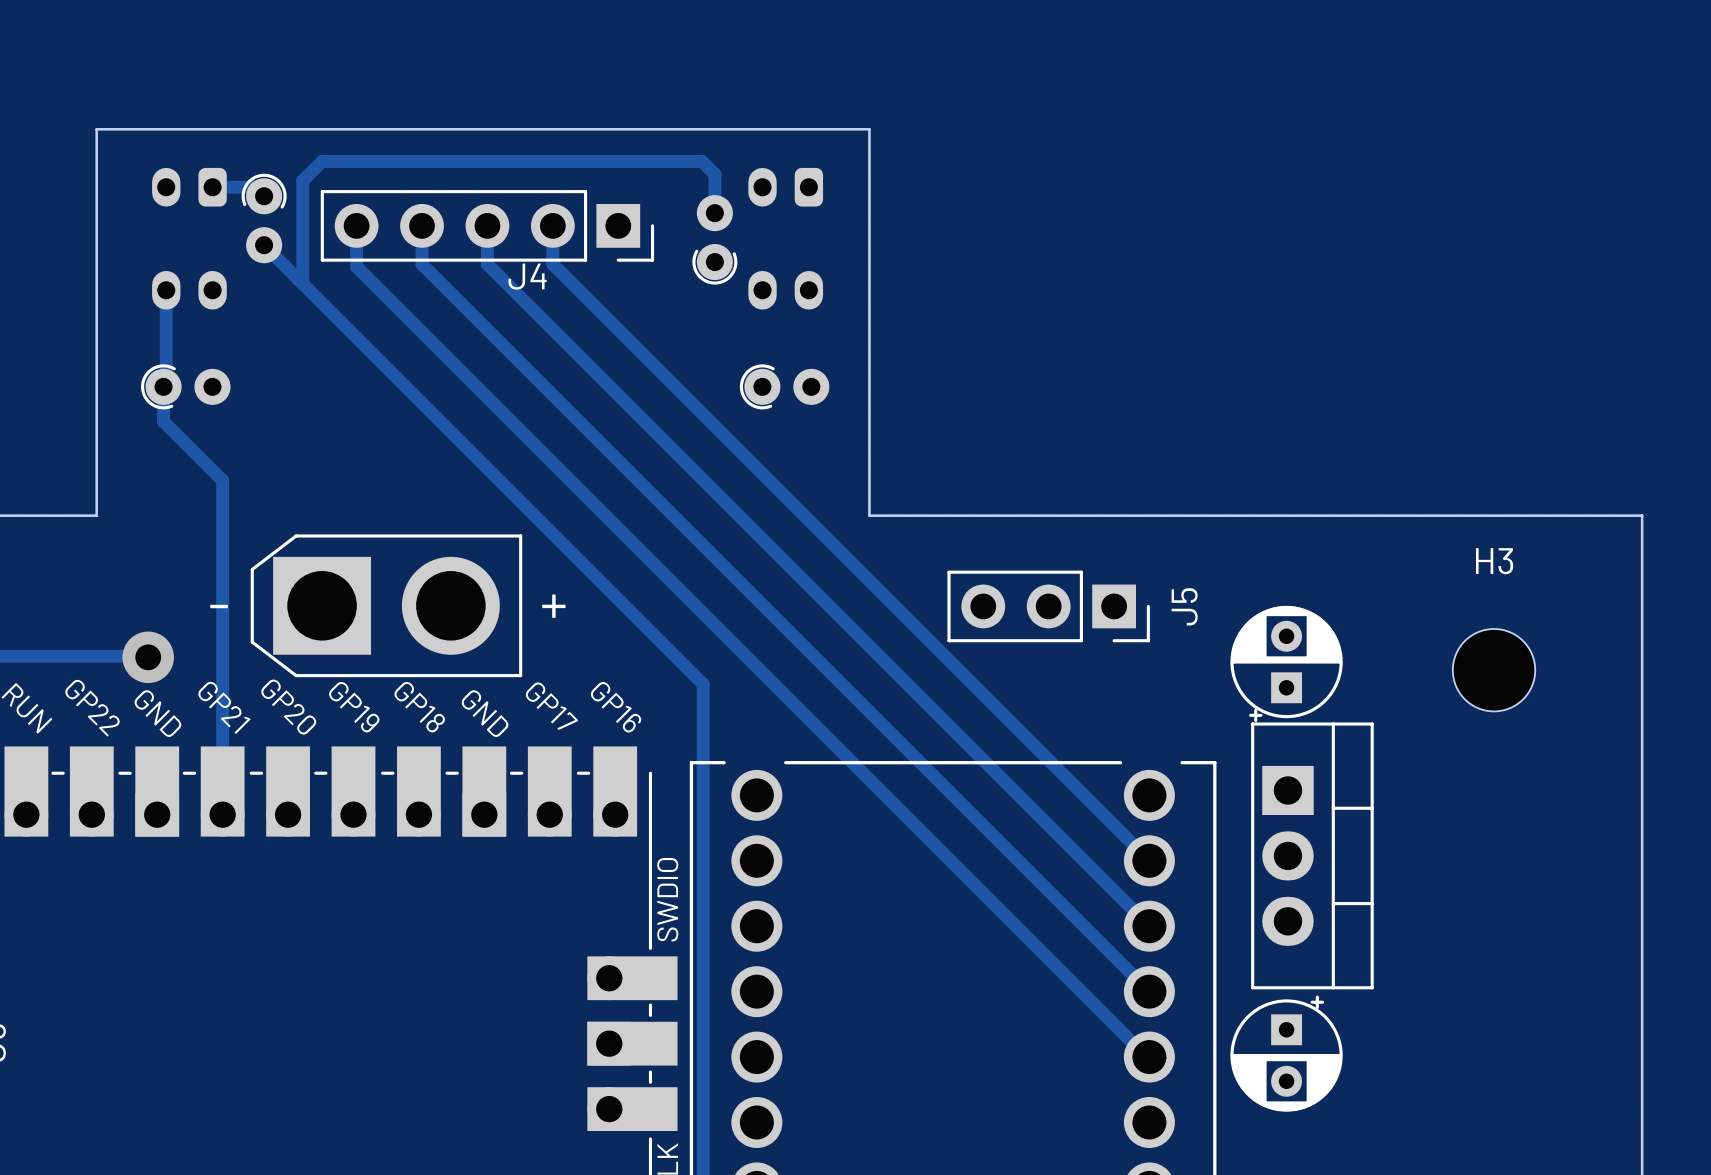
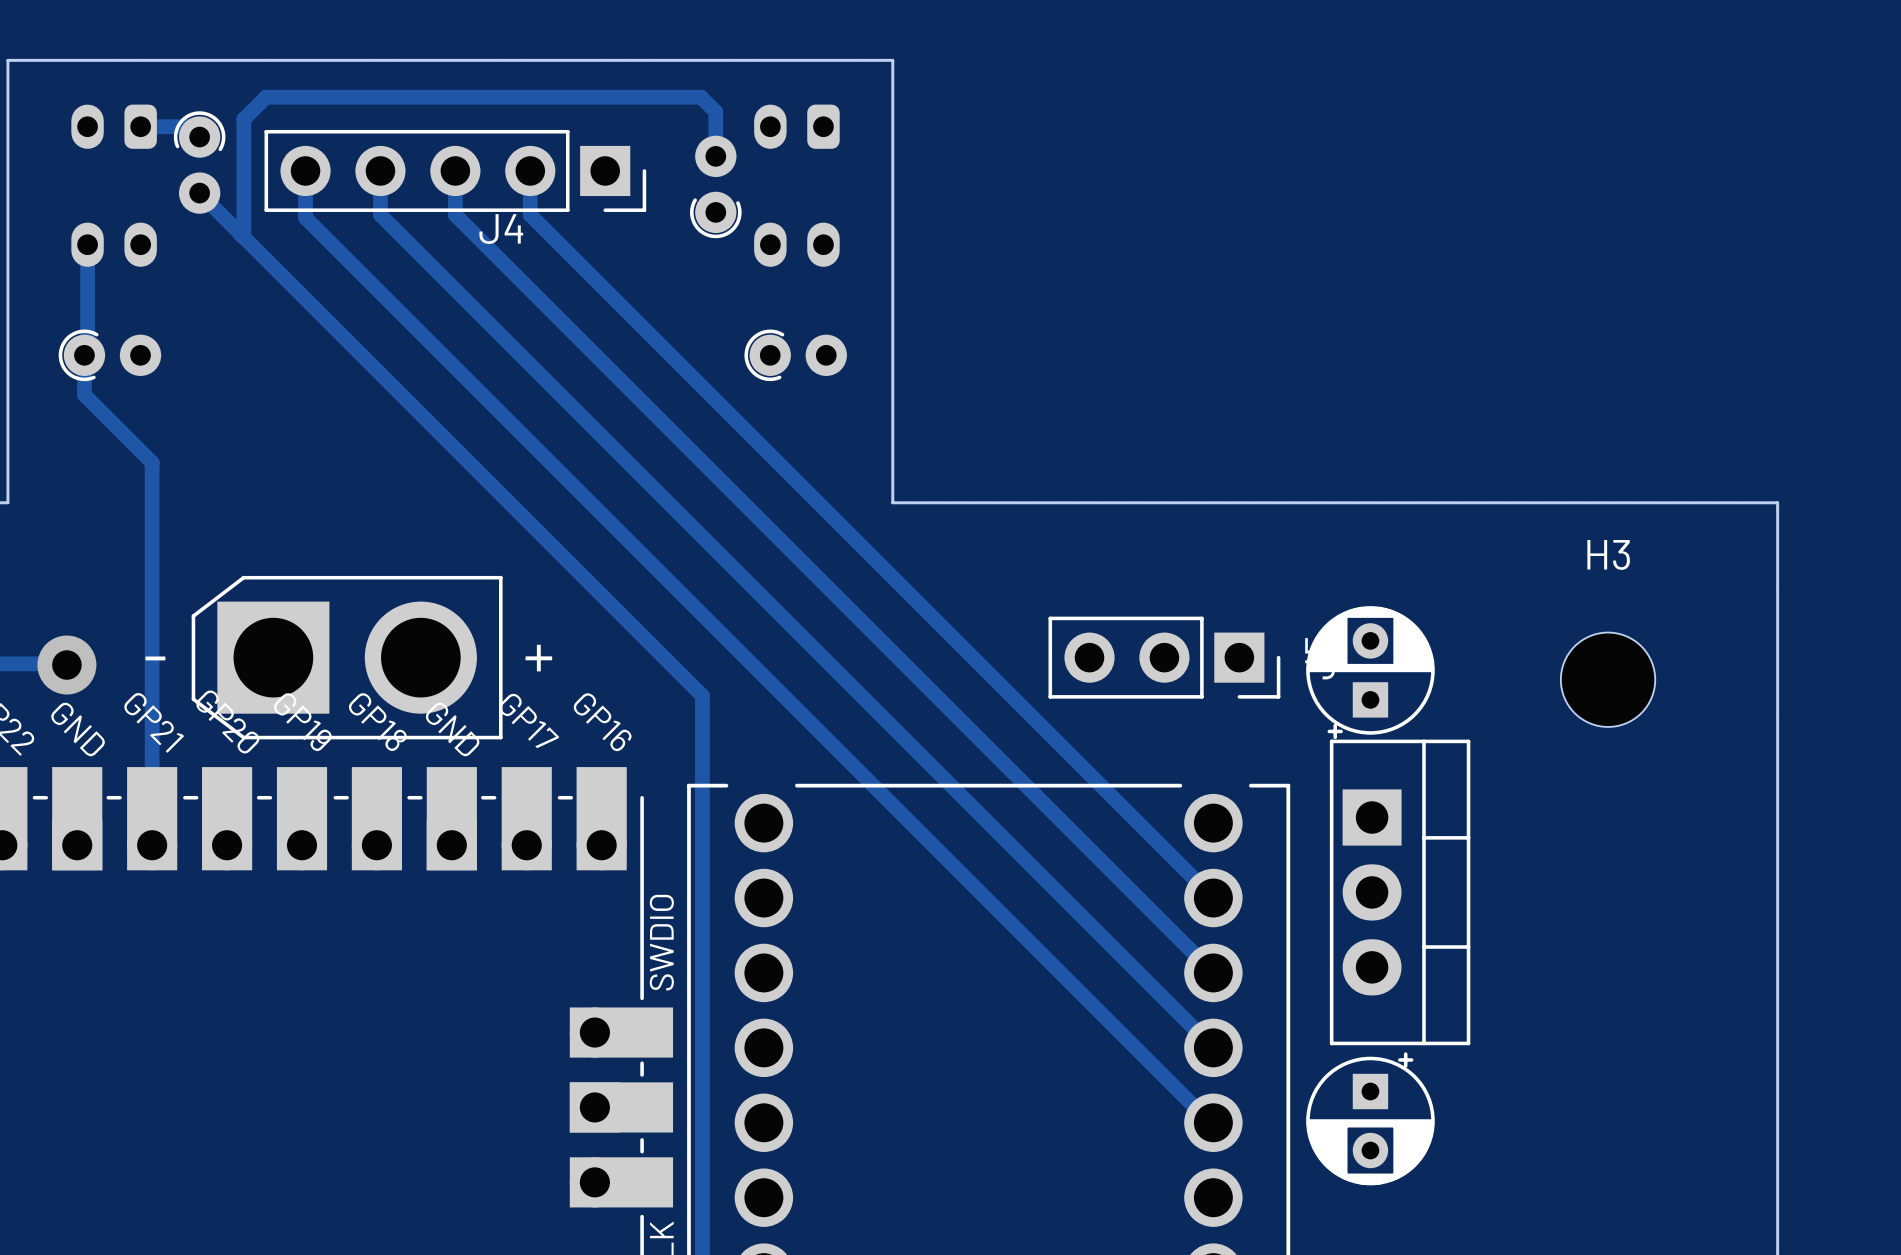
part position: (386, 605) -> (347, 657)
J5 position: (1048, 606) -> (1164, 657)

